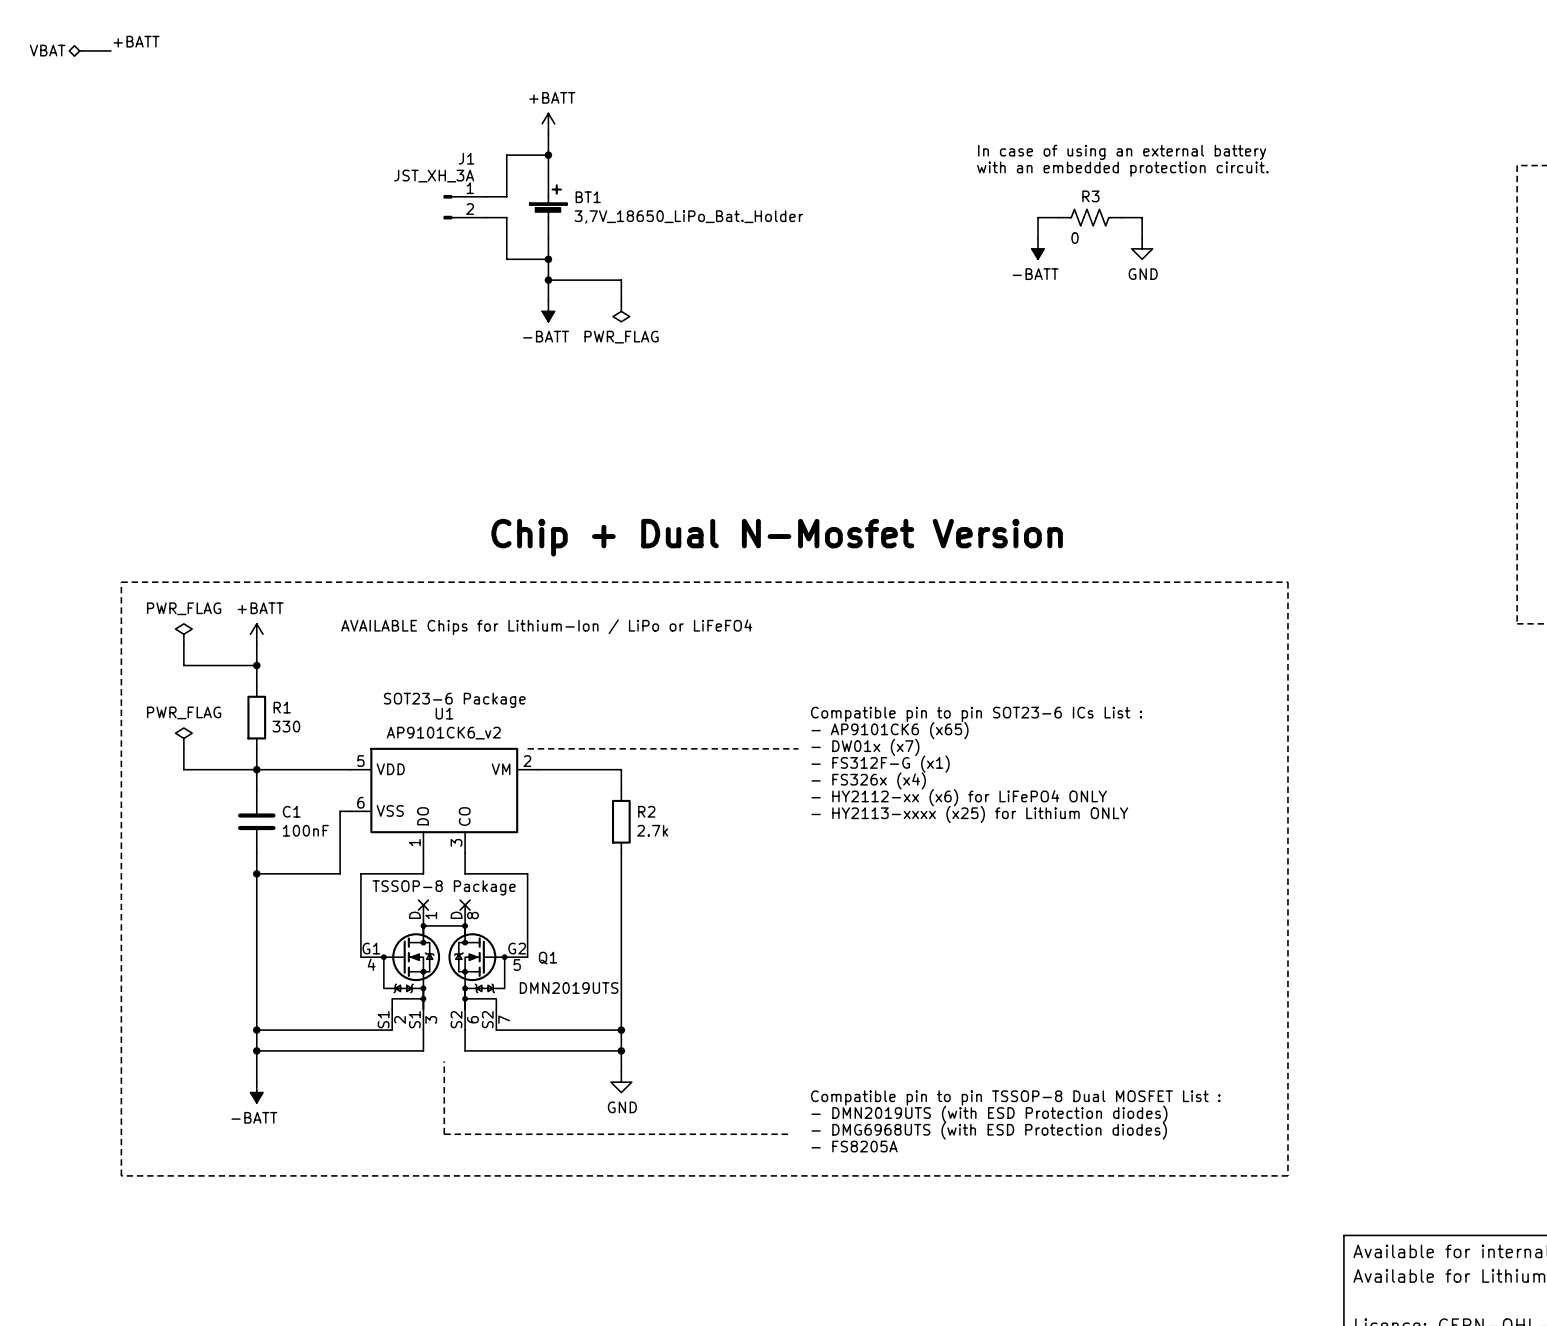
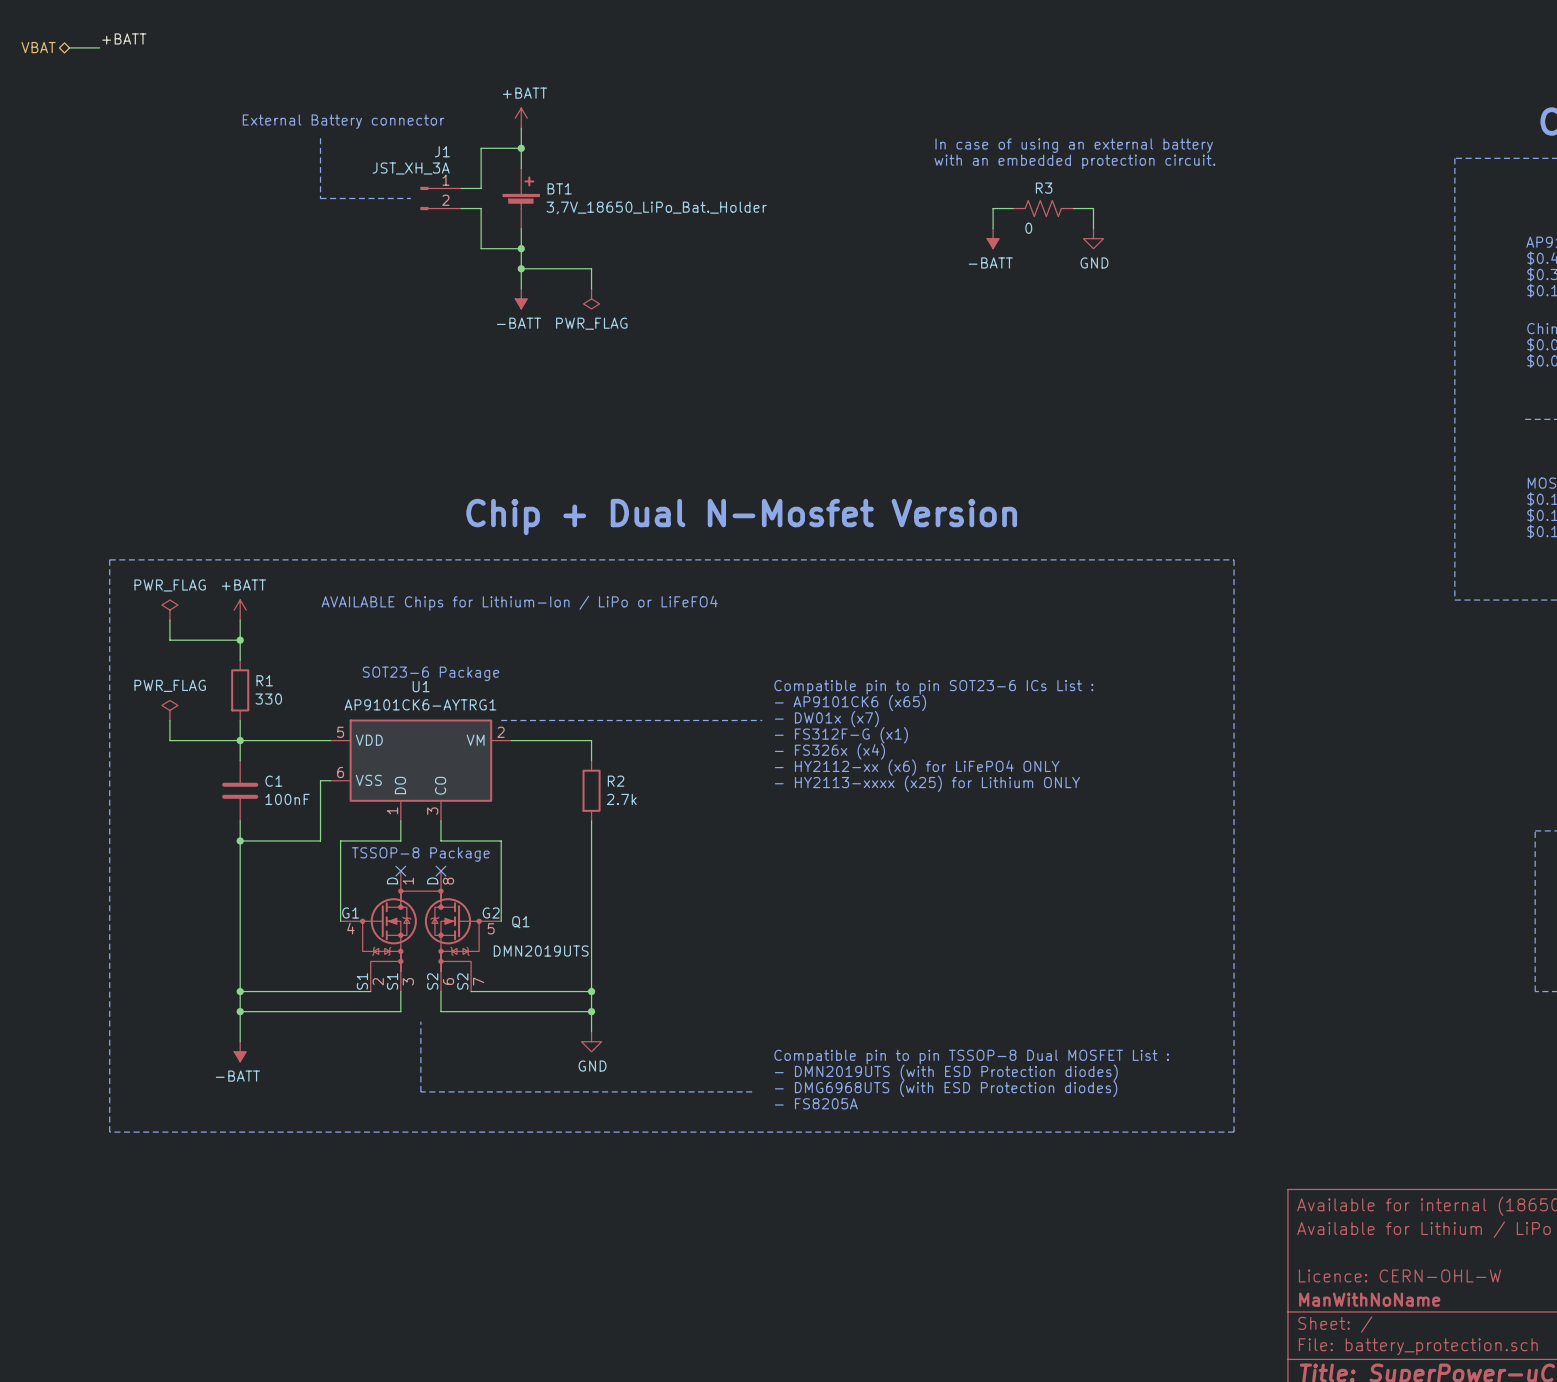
text: none -> External Battery connector (343, 121)
line: none -> (320, 138) (320, 198) (410, 198)
U1 value: AP9101CK6_v2 (443, 733) -> AP9101CK6-AYTRG1 (420, 704)

